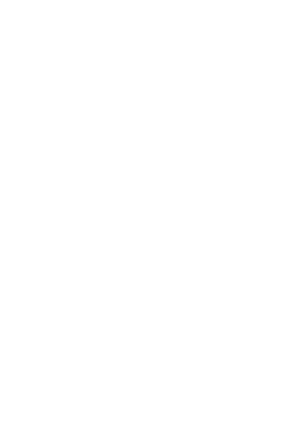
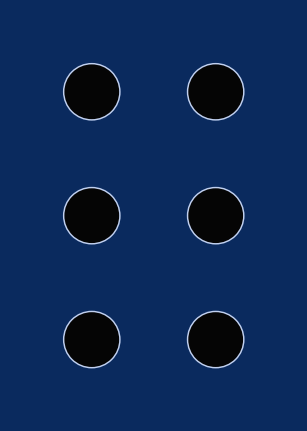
part: none -> (91, 91)
part: none -> (215, 91)
part: none -> (91, 215)
part: none -> (215, 215)
part: none -> (91, 339)
part: none -> (215, 339)

